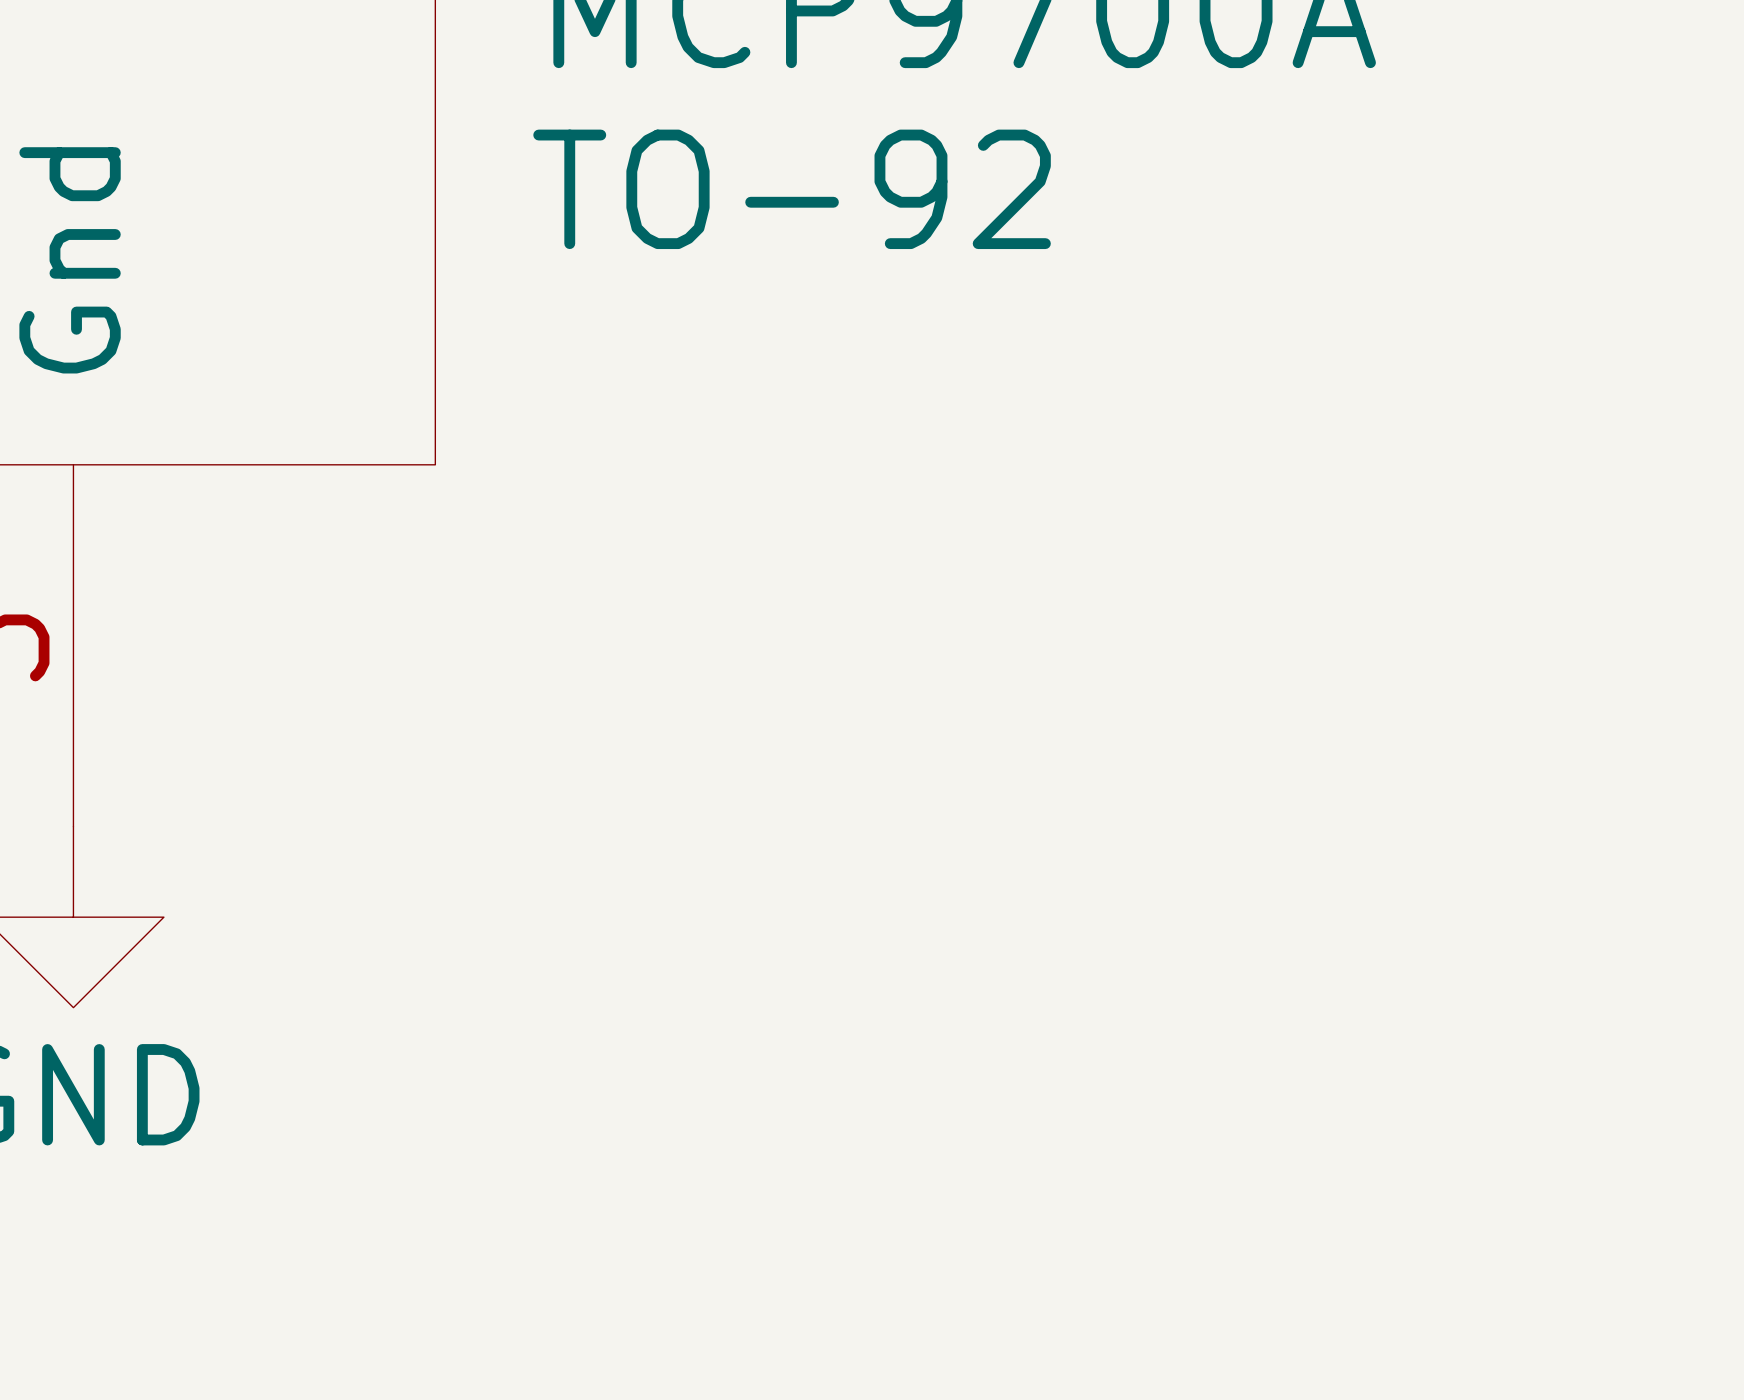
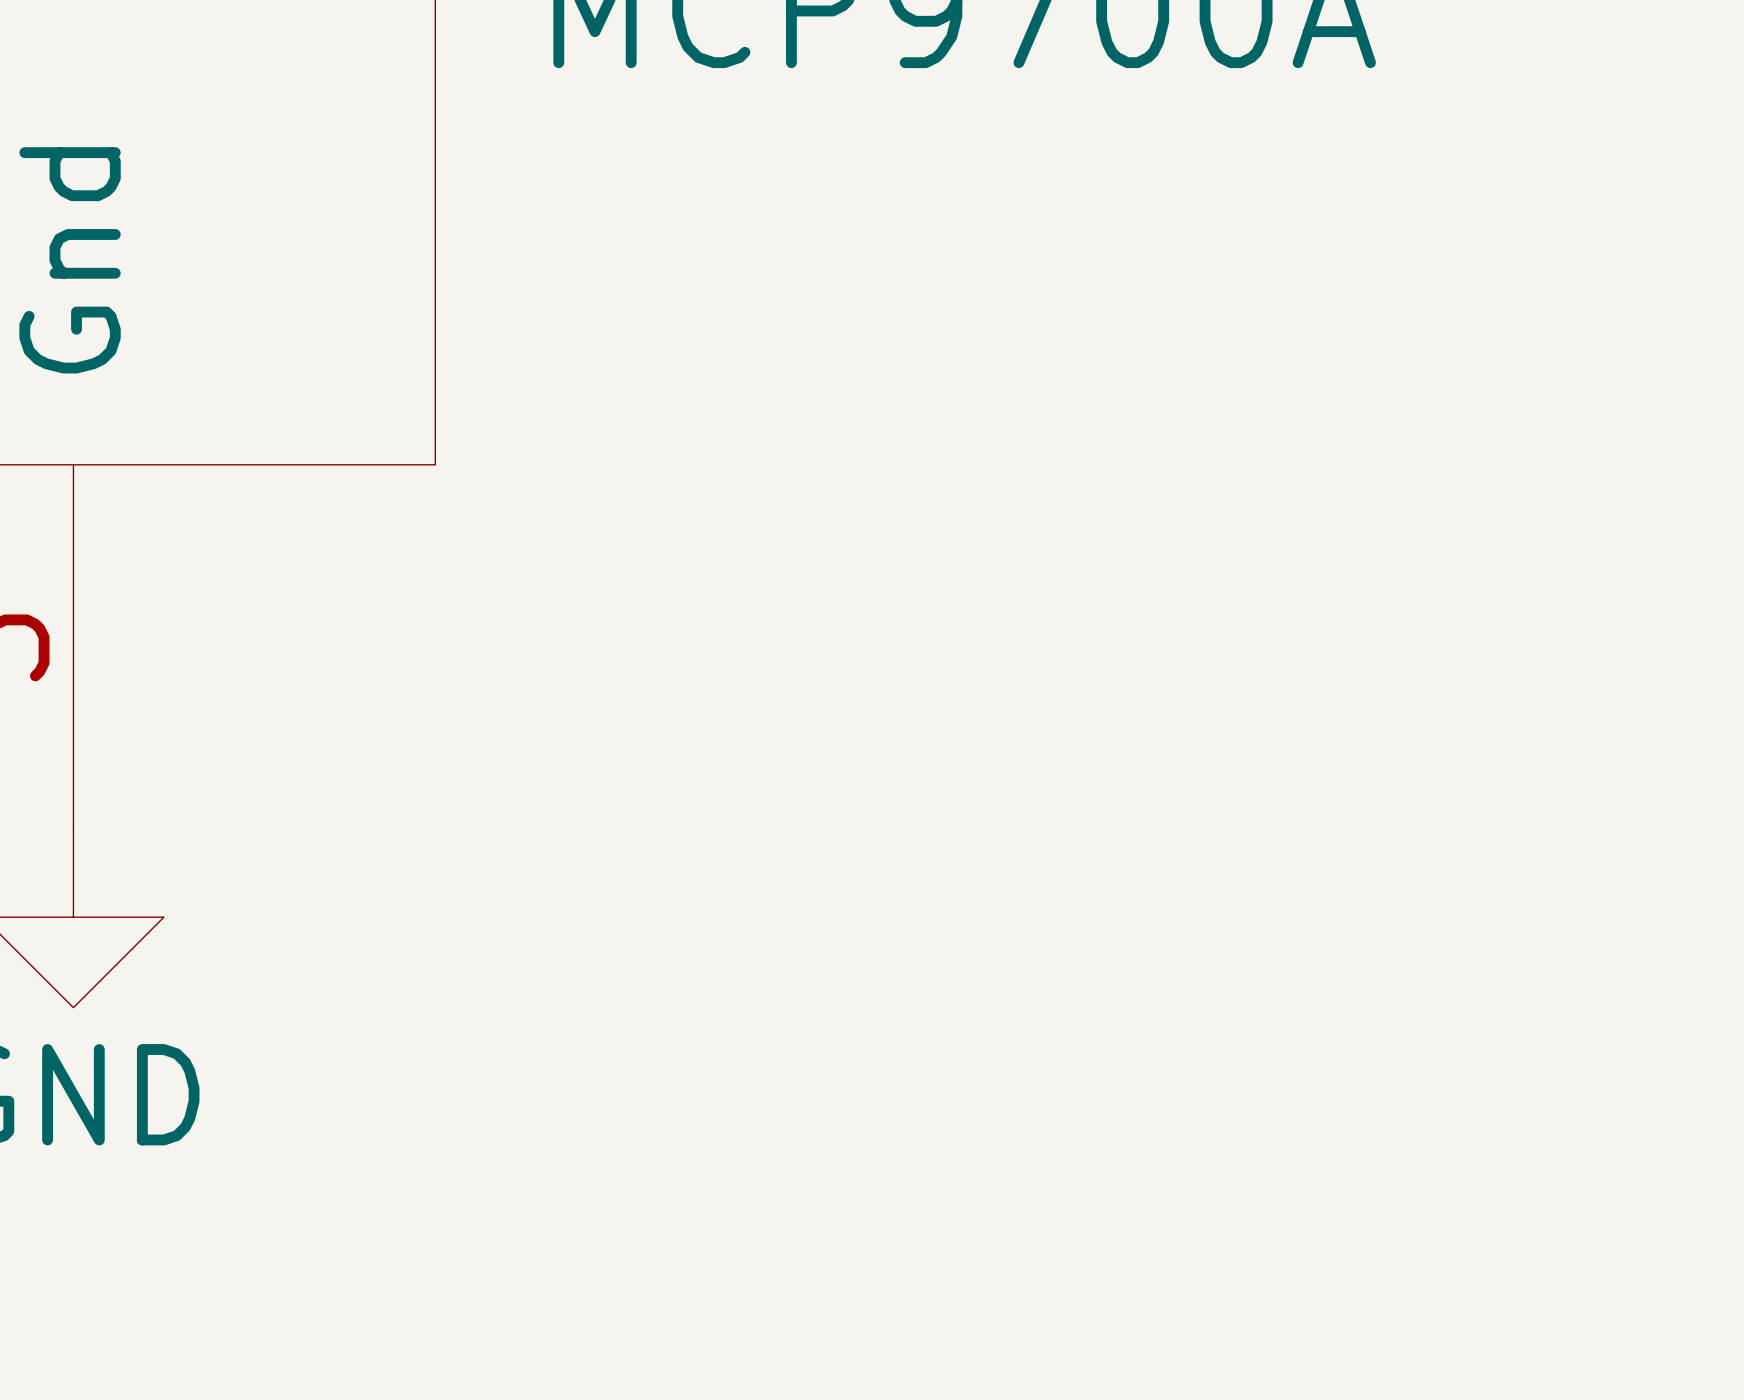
part text: TO-92 (792, 189) -> none

